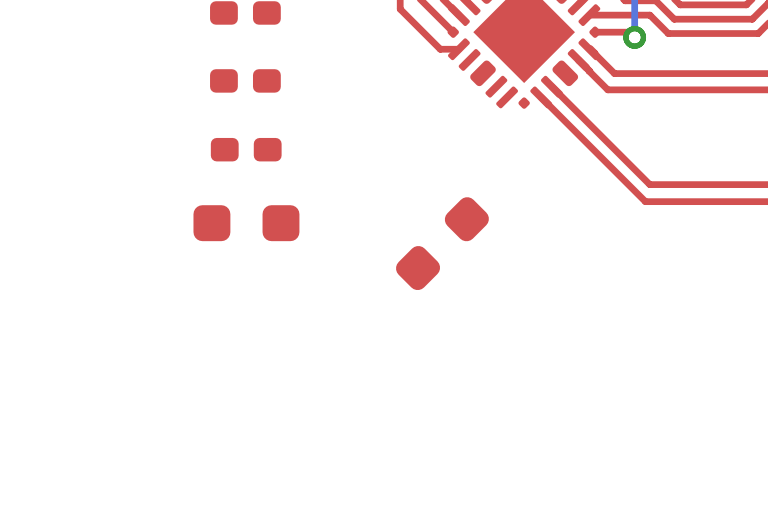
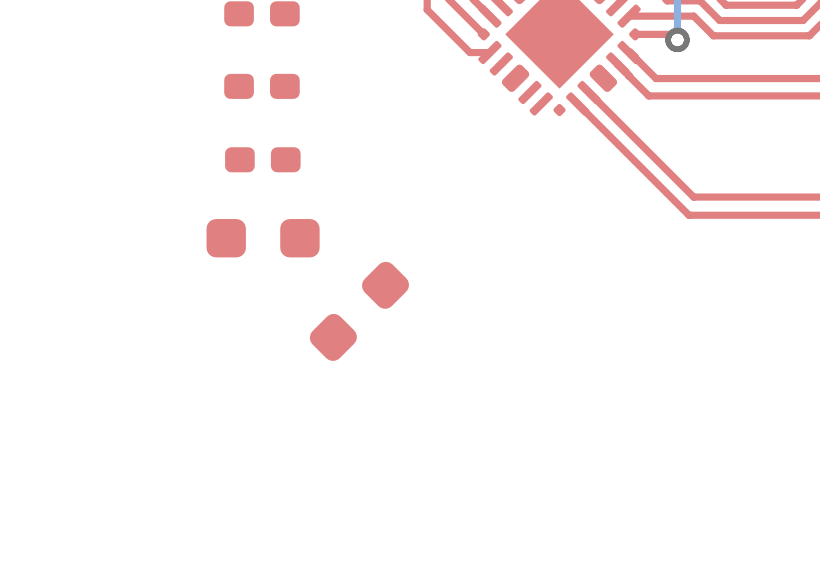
part position: (442, 243) -> (359, 311)

